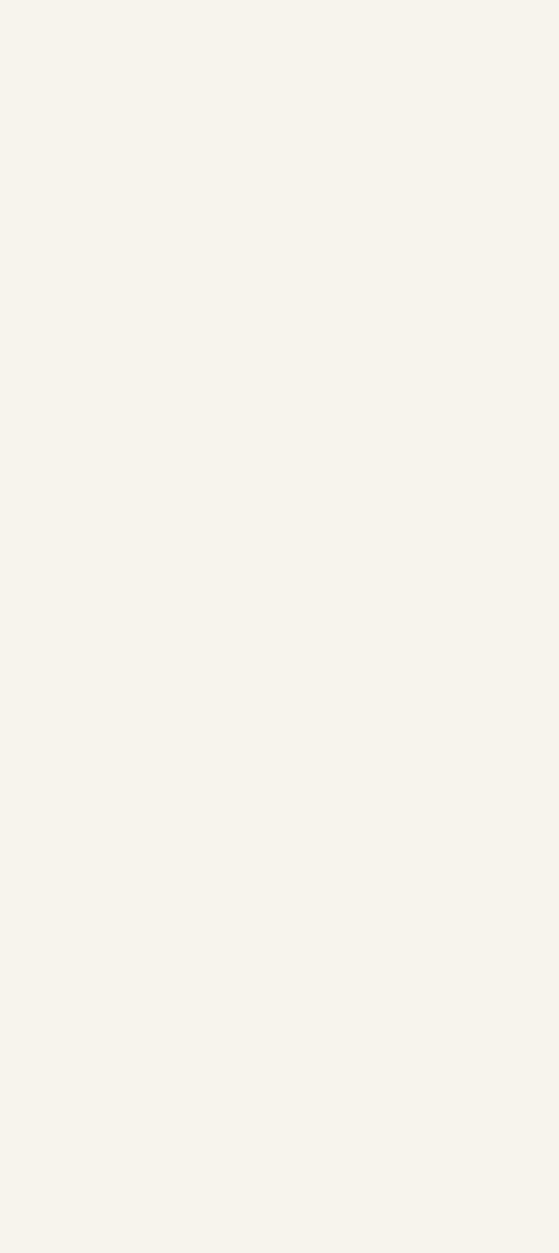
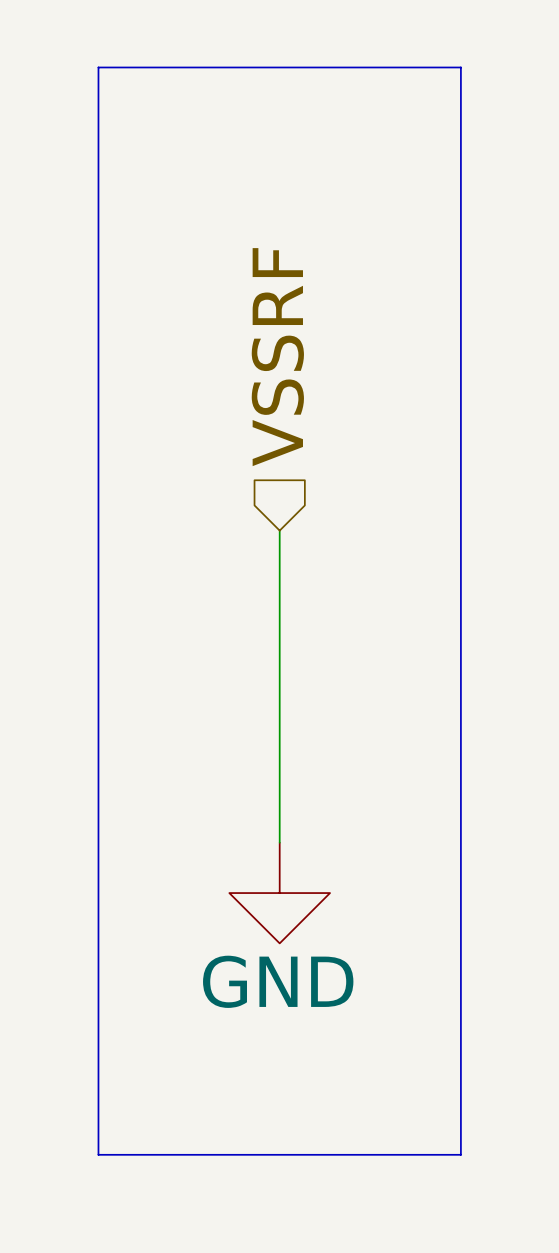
line: none -> (98, 67) (460, 67) (460, 1154) (98, 1154) (98, 67)
hierarchical label: none -> VSSRF (277, 357)
wire: none -> (279, 530) (279, 842)
power symbol: none -> GND (279, 893)

